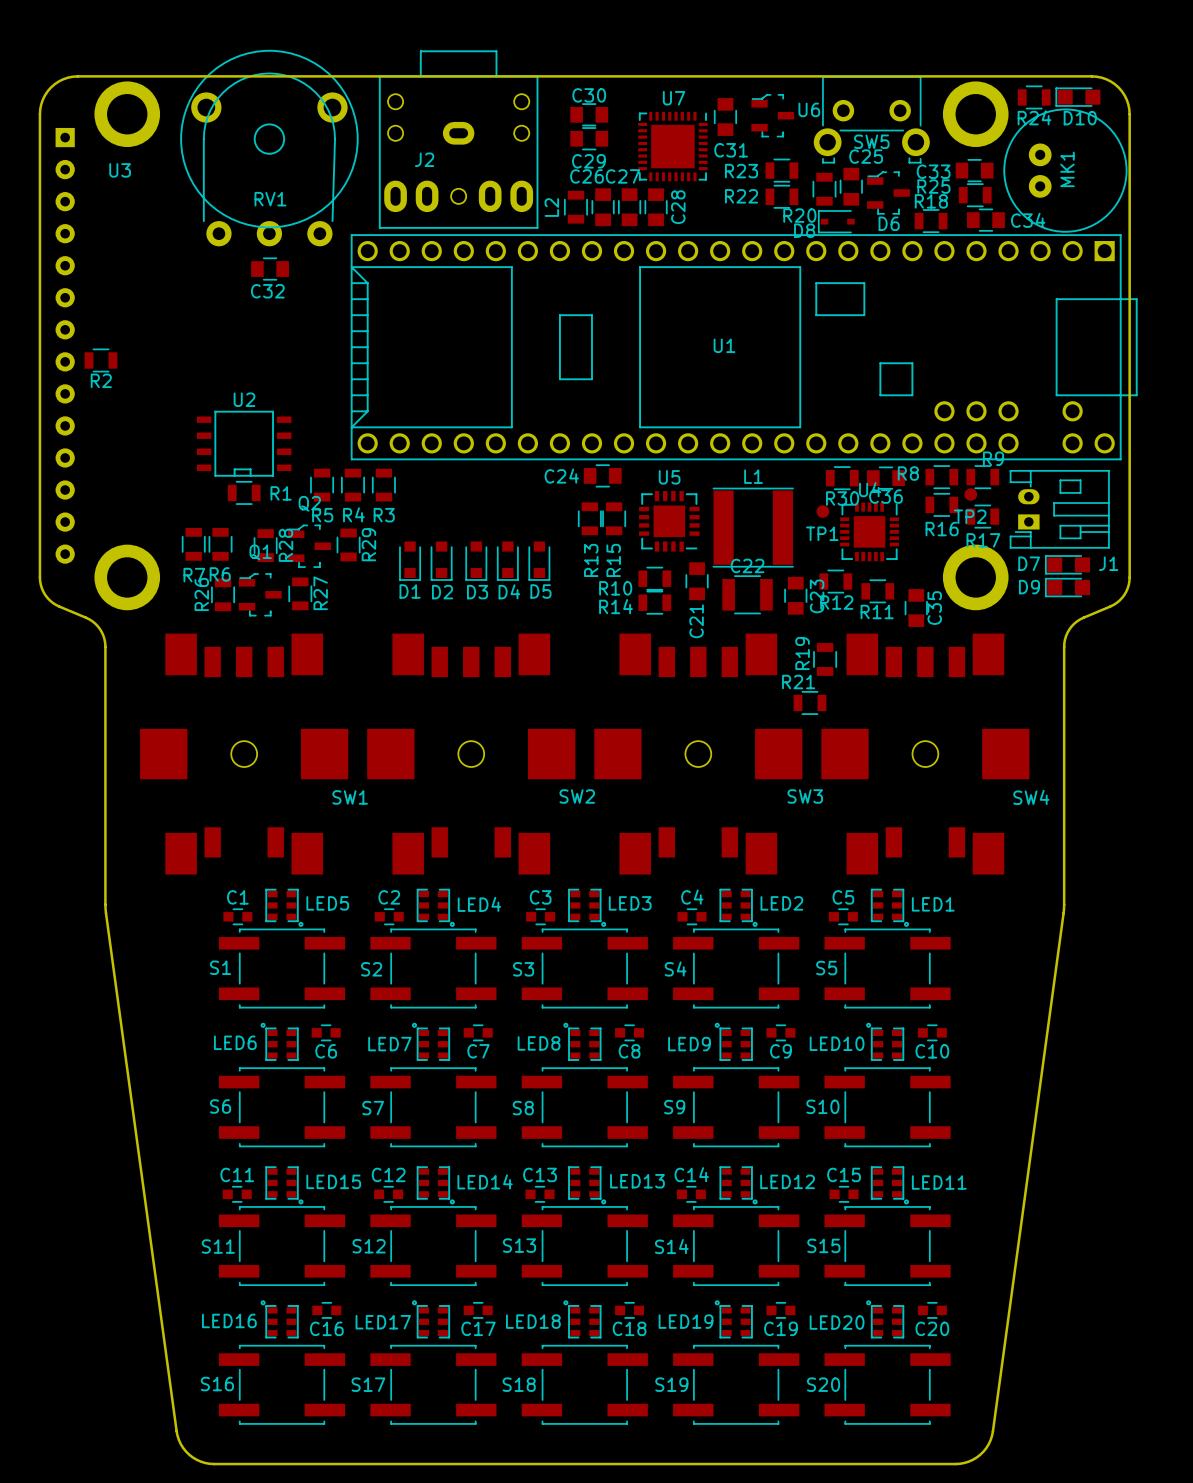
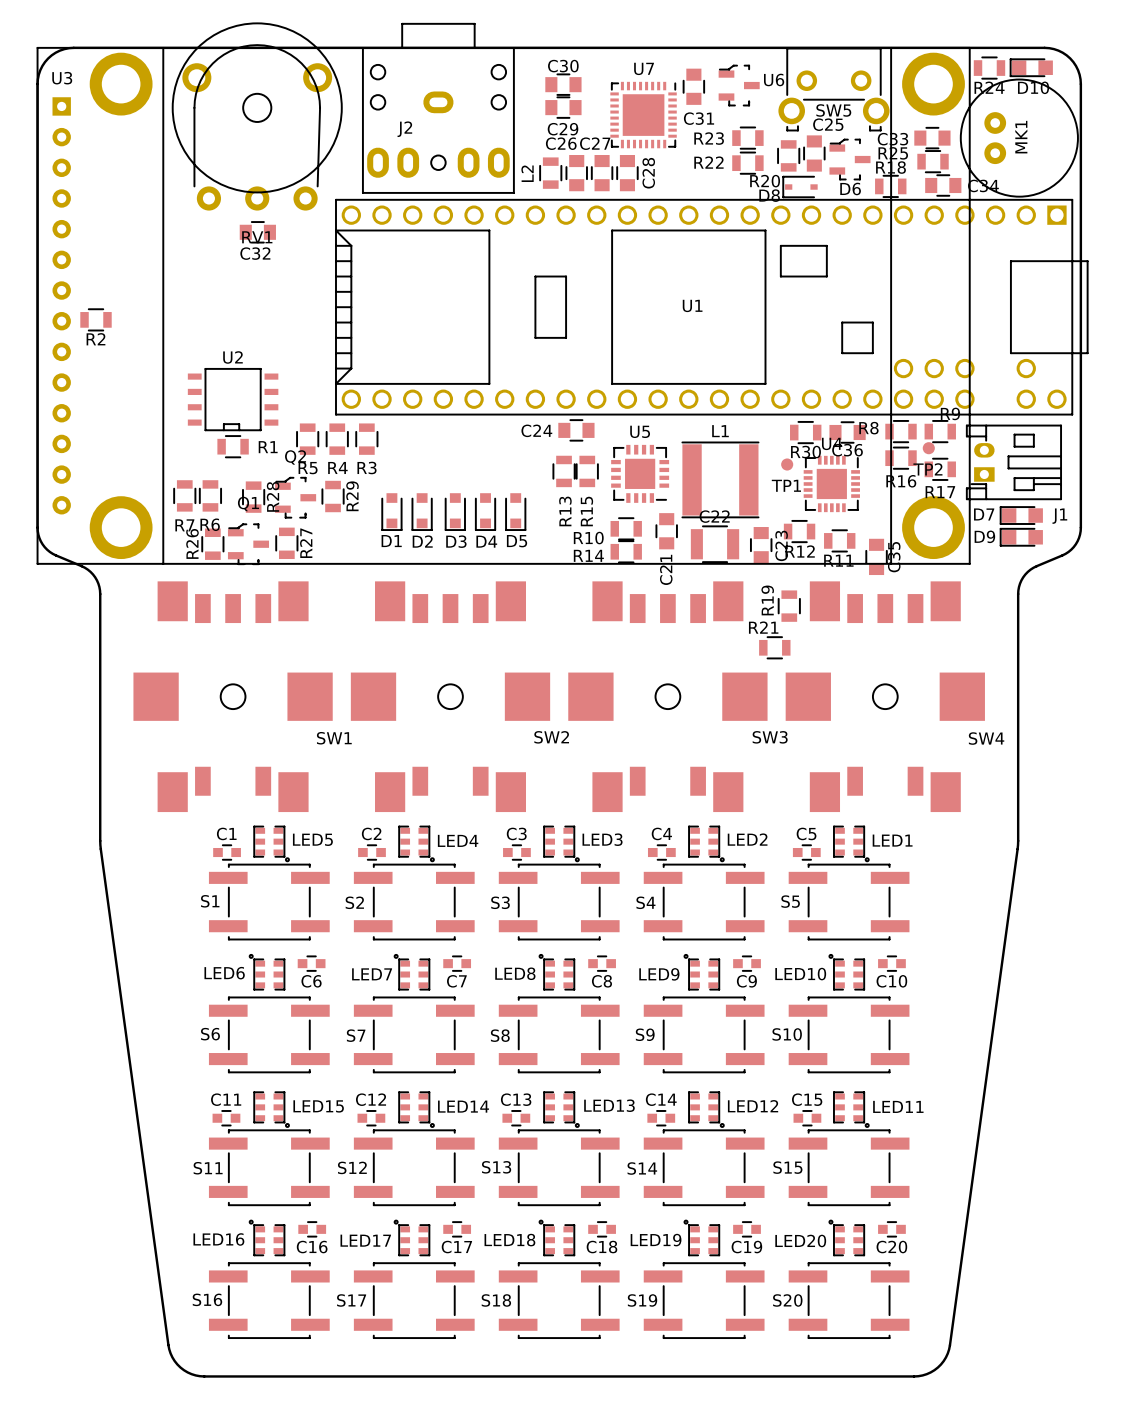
U3 footprint: [55, 81, 1009, 611] -> [36, 46, 971, 565]
U3 name position: U3 (120, 170) -> U3 (62, 78)
RV1 name position: RV1 (270, 199) -> RV1 (257, 237)

